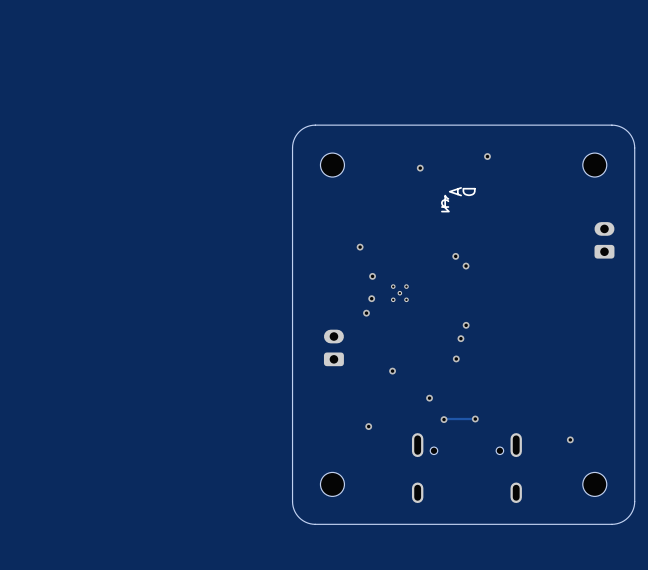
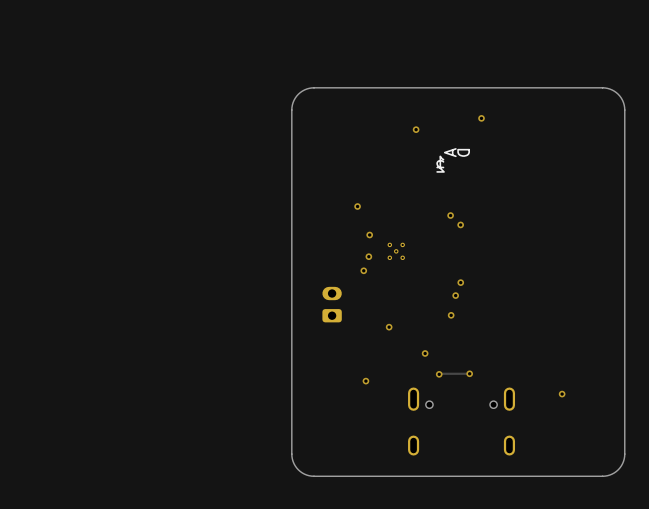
part: (332, 165) -> none
part: (594, 165) -> none
part: (604, 240) -> none
part: (332, 484) -> none
part: (594, 484) -> none

